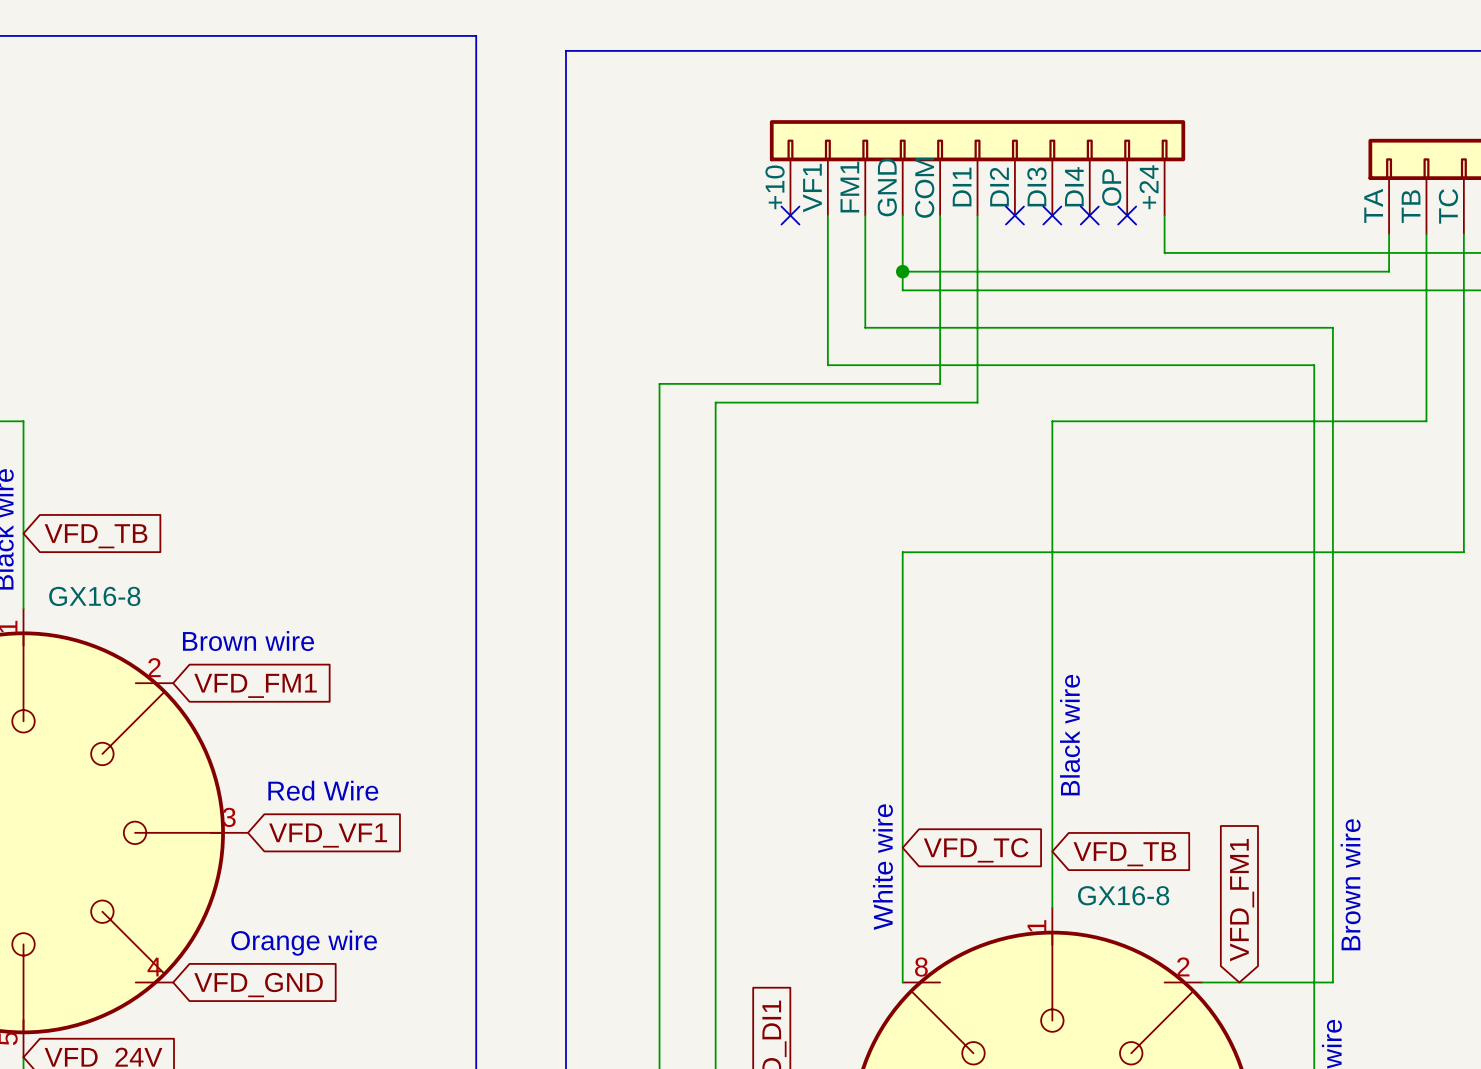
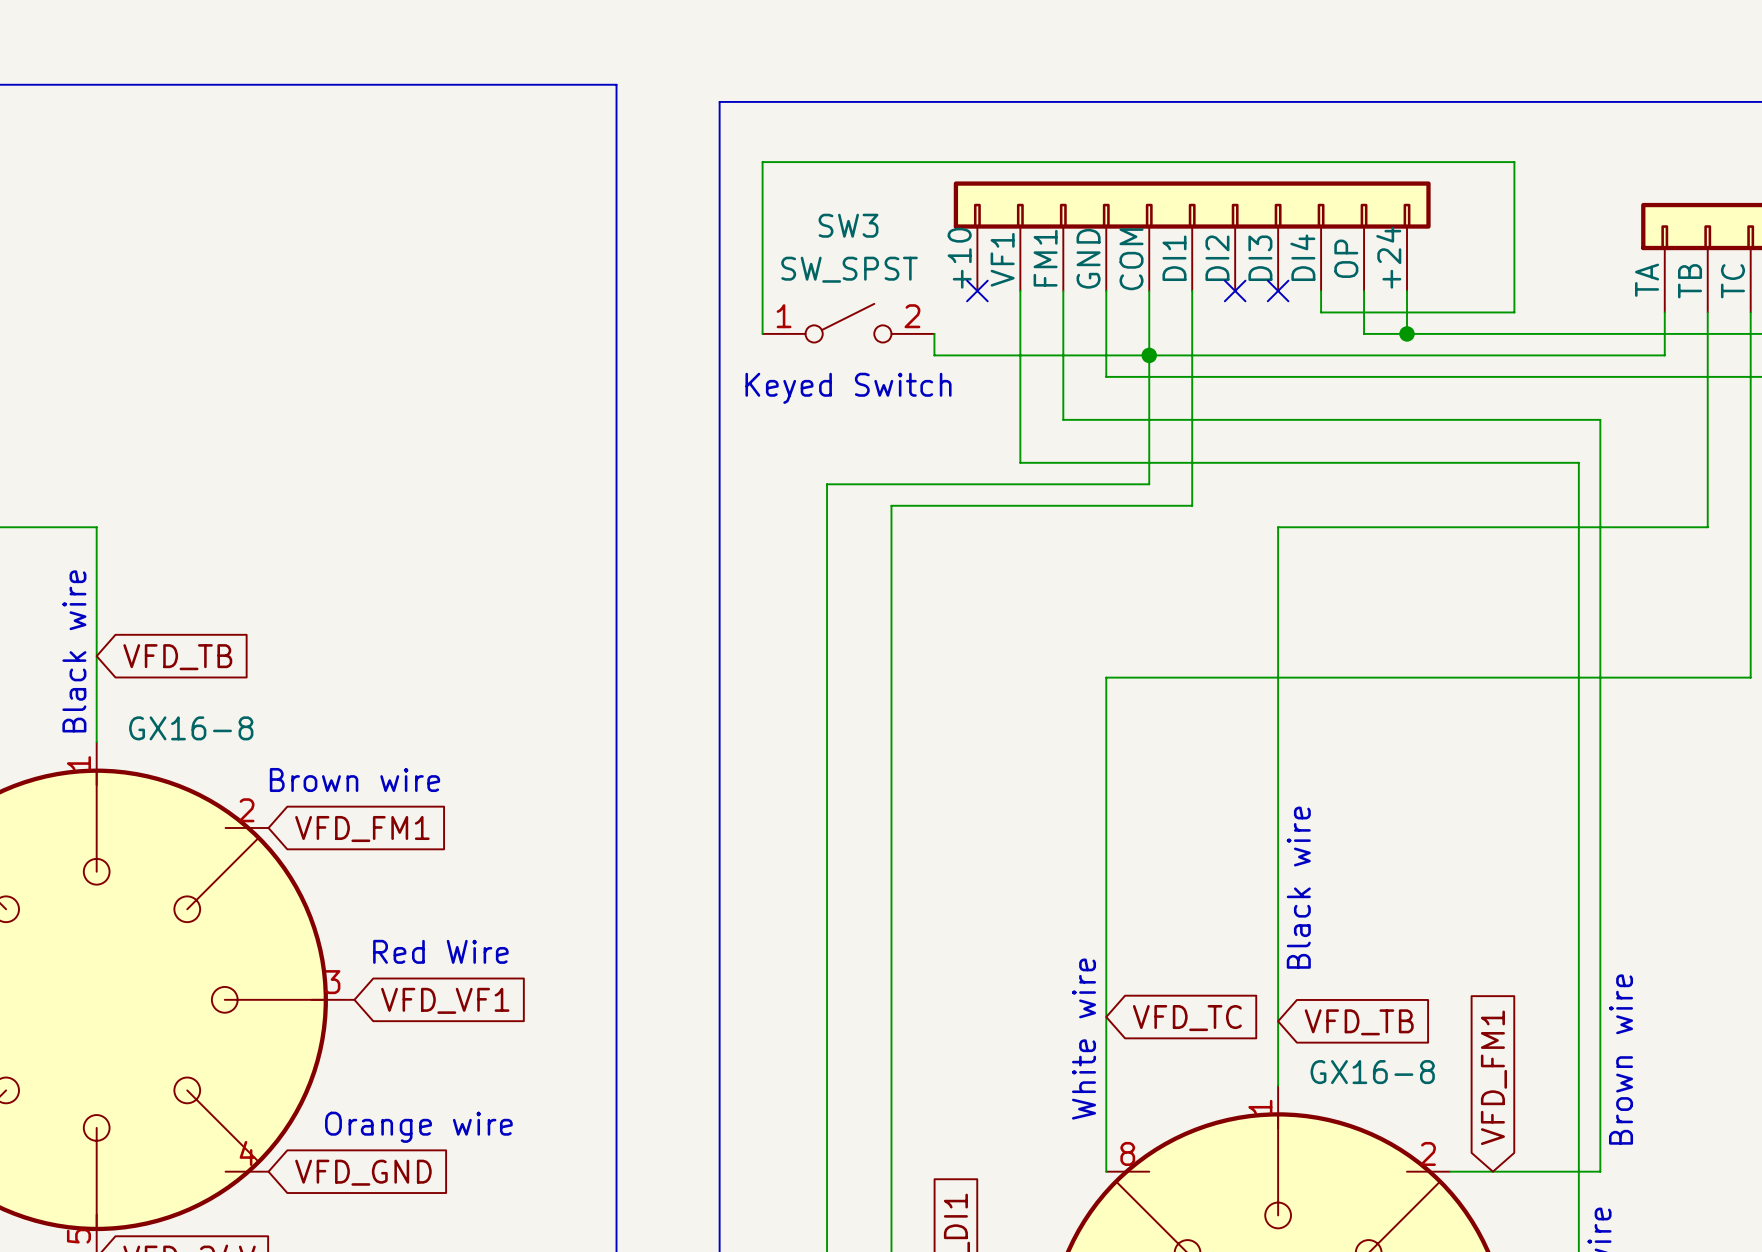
wire: none -> (1321, 290) (1321, 312) (1514, 312) (1514, 162) (762, 162) (762, 333)
no-connect mark: (1089, 215) -> none
wire: none -> (1364, 290) (1364, 333) (1407, 333)
no-connect mark: (1127, 215) -> none
SW3: none -> SW_SPST (848, 323)
wire: none -> (934, 333) (934, 355) (1106, 355)
junction: none -> (1407, 333)
junction position: (902, 271) -> (1149, 355)
text: none -> Keyed Switch (848, 388)

